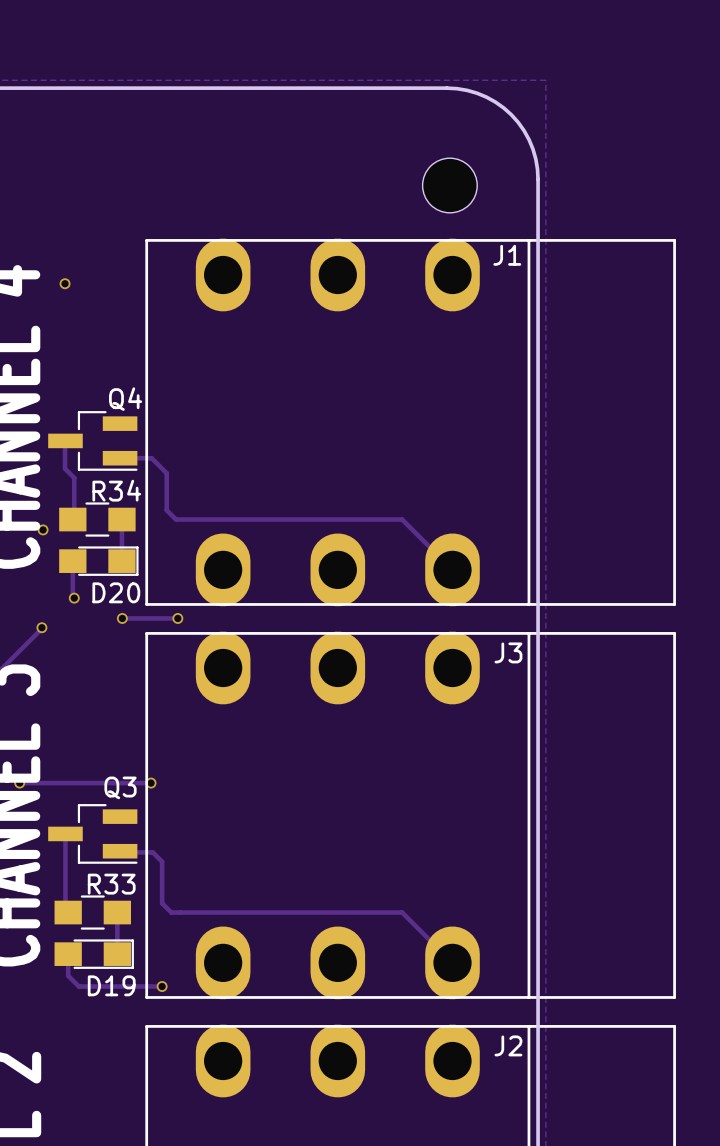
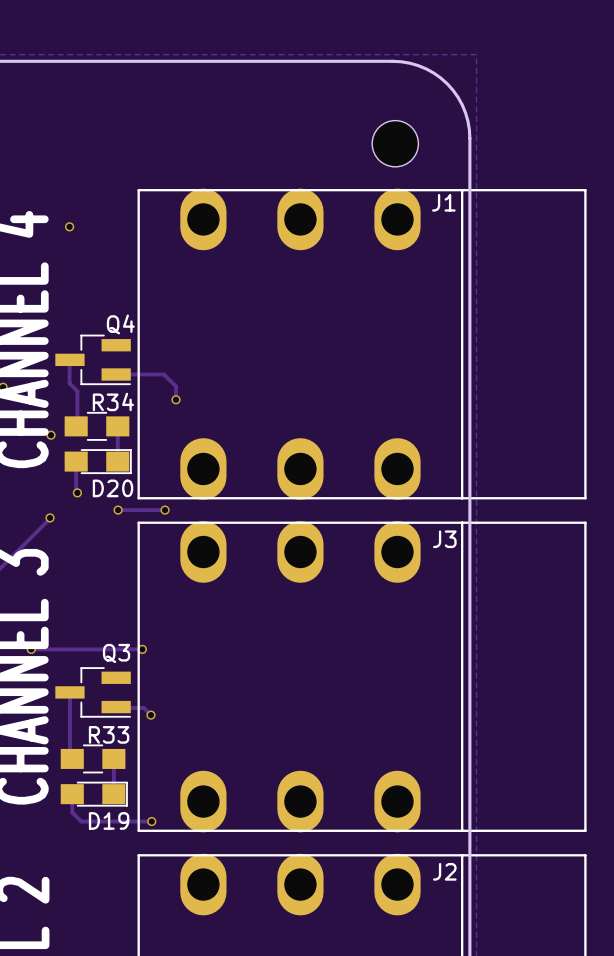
track: (151, 458) (166, 473) (166, 510) (175, 519) (402, 519) (452, 569) -> (142, 374) (164, 374) (176, 386) (176, 399)
via: none -> (176, 399)
via: none -> (150, 715)
track: (162, 861) (162, 903) (171, 912) (402, 912) (452, 962) -> none

